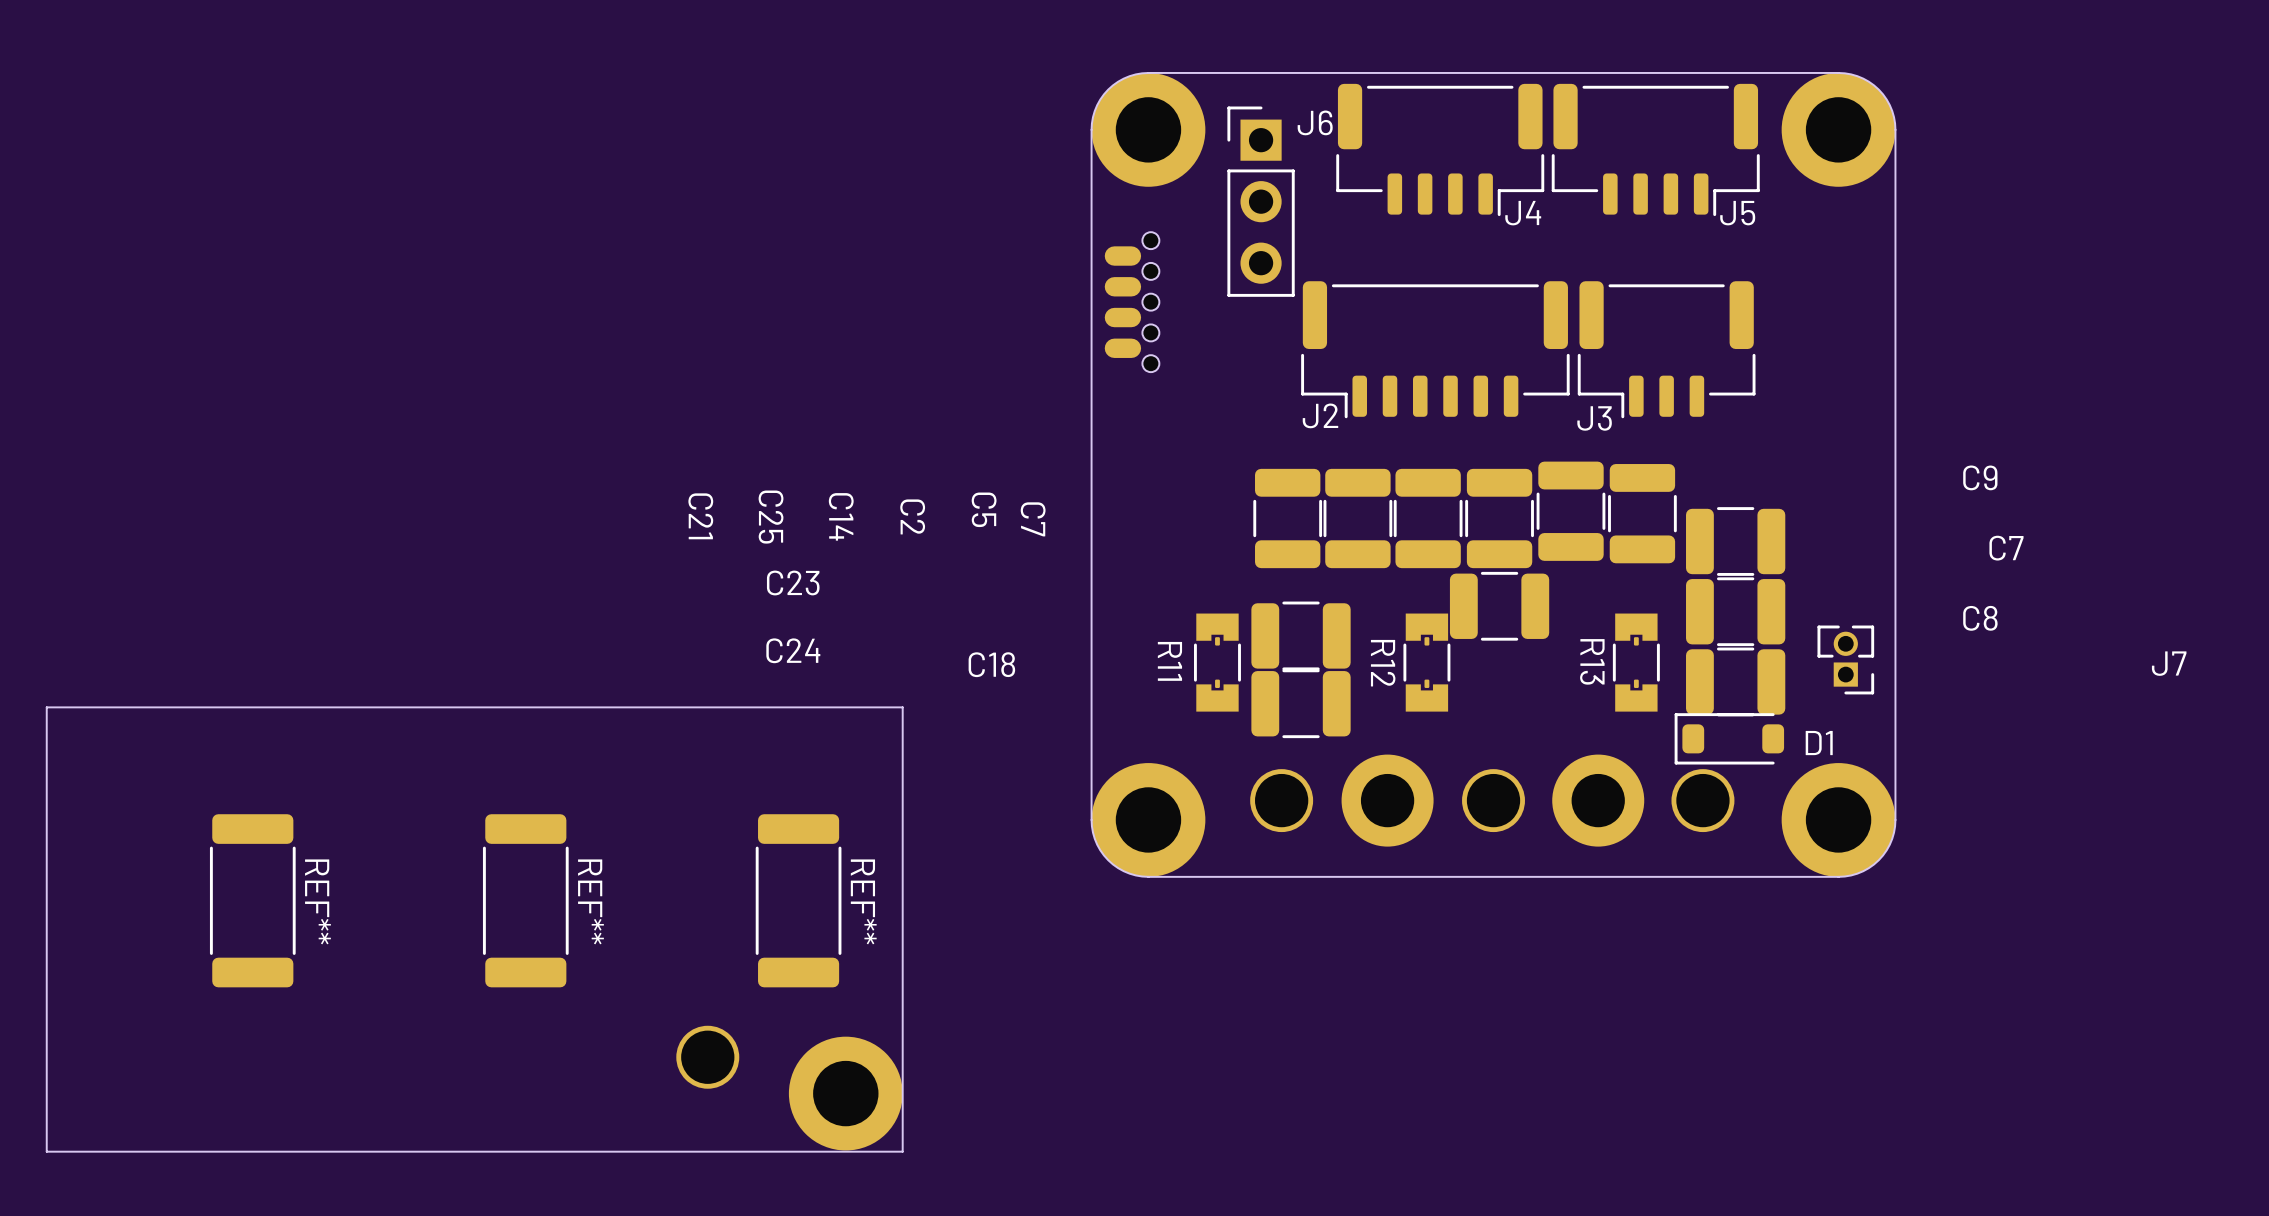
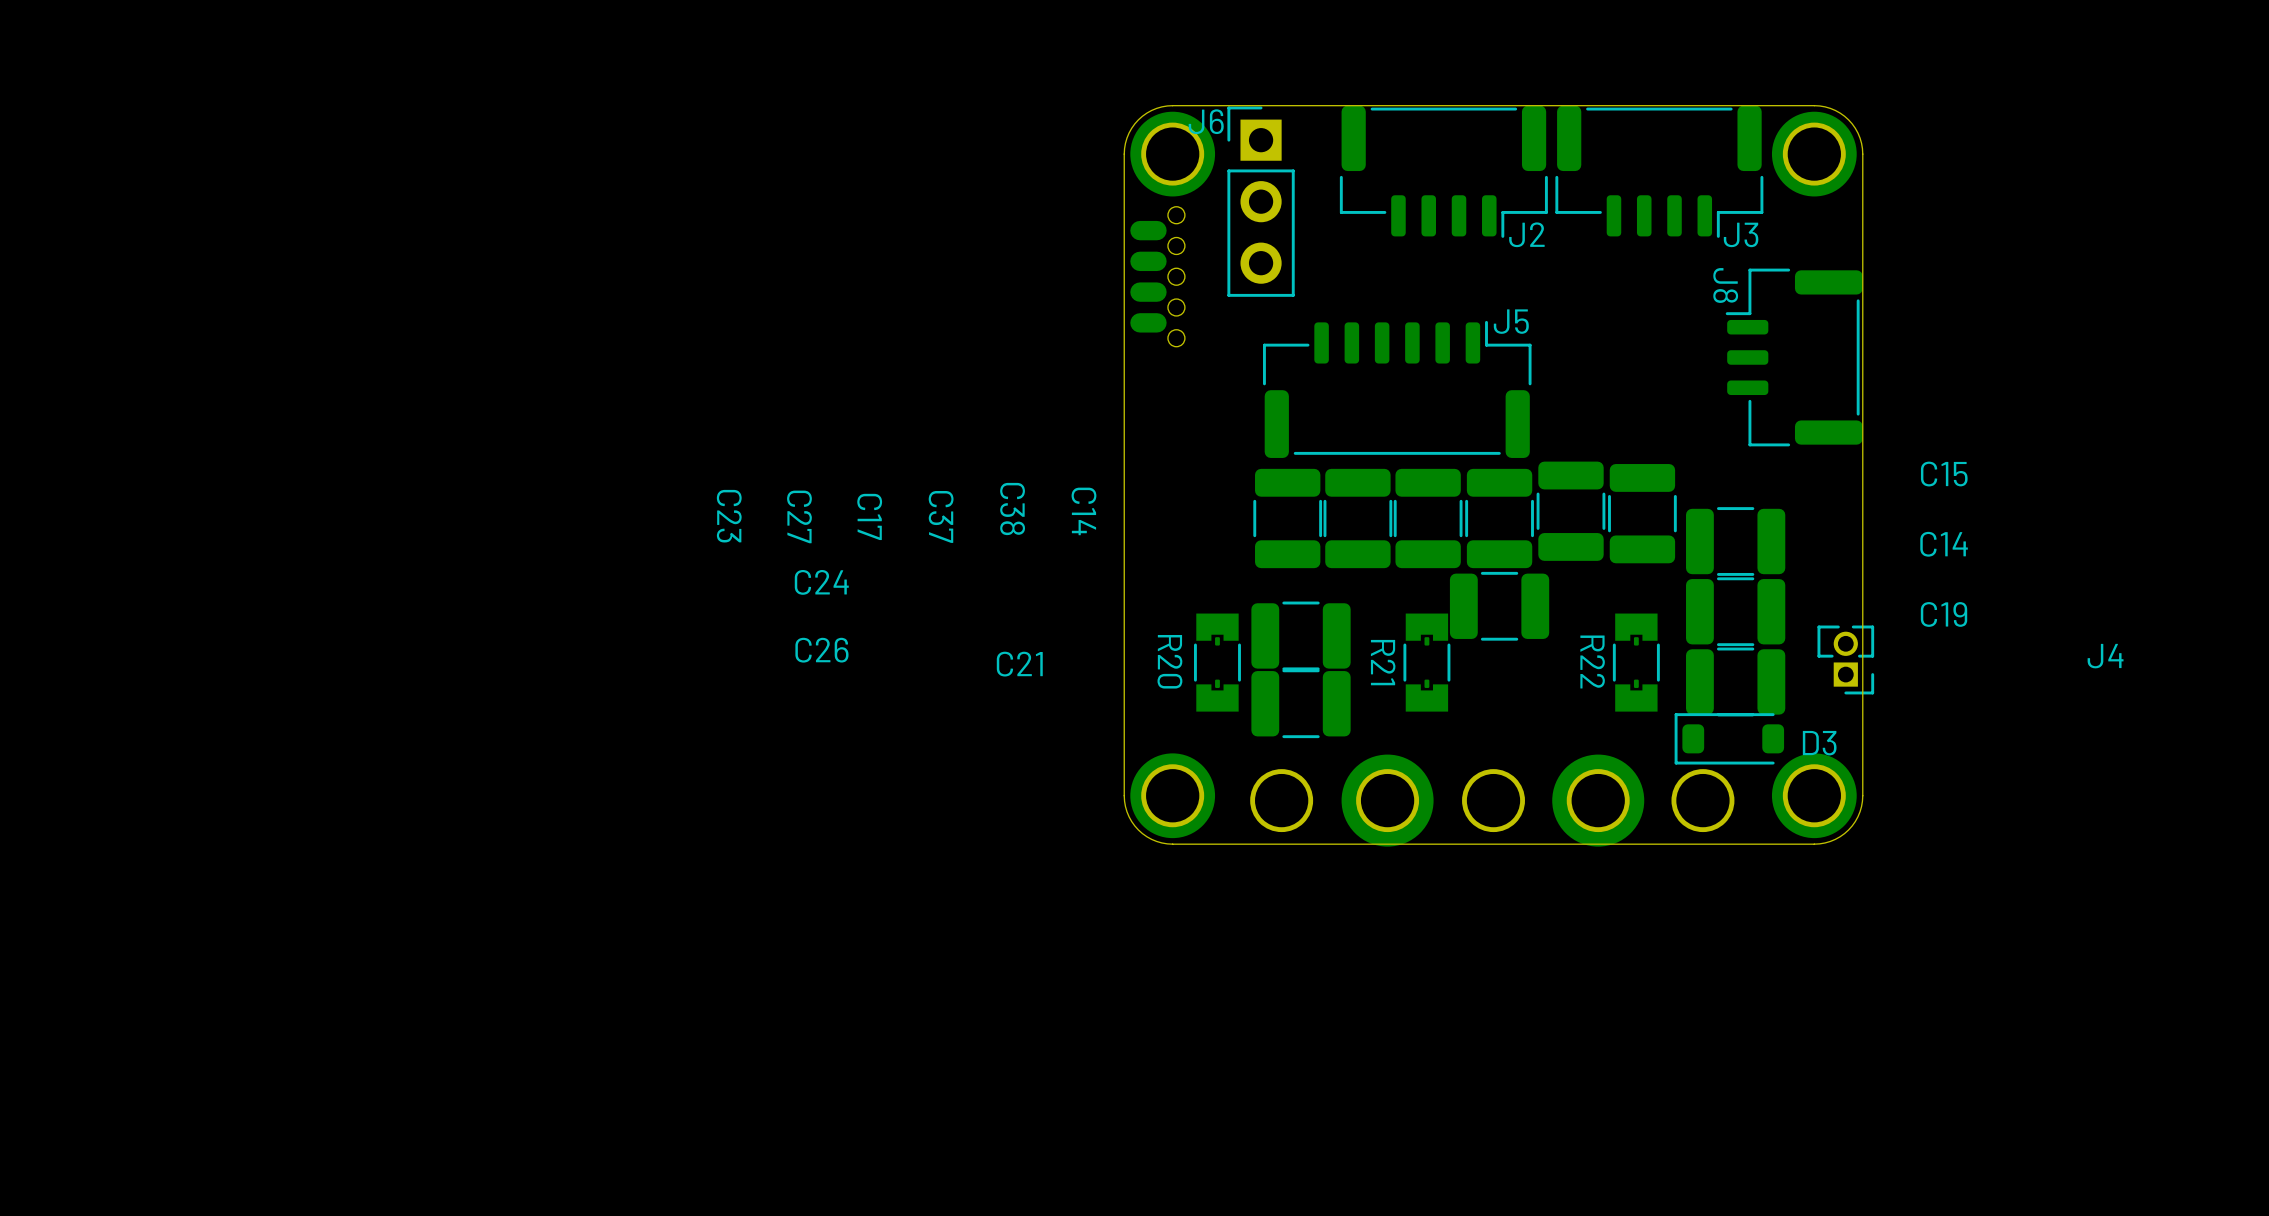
board edge: (1838, 72) (1148, 72) (1123, 78) (1108, 89) (1094, 111) (1091, 129) (1091, 819) (1097, 844) (1108, 860) (1129, 873) (1148, 876) (1838, 876) (1863, 871) (1878, 860) (1892, 838) (1895, 819) (1895, 129) (1892, 111) (1878, 89) (1863, 78) (1838, 72) -> (1814, 105) (1830, 108) (1848, 119) (1860, 138) (1862, 154) (1862, 795) (1860, 811) (1848, 829) (1830, 841) (1814, 844) (1172, 844) (1151, 839) (1138, 829) (1129, 816) (1124, 795) (1124, 154) (1126, 138) (1138, 119) (1156, 108) (1172, 105) (1814, 105)
J5 footprint: [1551, 83, 1760, 217] -> [1262, 320, 1532, 458]
J6 name position: J6 (1315, 122) -> J6 (1206, 121)
part: (1148, 129) -> none
part: (1838, 129) -> none
J4: (1440, 149) -> none
part: none -> (1172, 154)
part: none -> (1814, 154)
J5 name position: J5 (1737, 213) -> J5 (1511, 321)
J2 footprint: [1301, 281, 1570, 419] -> [1339, 105, 1548, 238]
J3 footprint: [1577, 281, 1756, 419] -> [1555, 105, 1764, 238]
part position: (1132, 302) -> (1157, 276)
J8: none -> (1794, 357)
J2 name position: J2 (1320, 415) -> J2 (1526, 234)
J3 name position: J3 (1594, 418) -> J3 (1741, 234)
C9 name: C9 (1980, 477) -> C15 (1944, 474)
C5 name: C5 (984, 509) -> C38 (1012, 509)
C21 name: C21 (700, 516) -> C23 (729, 516)
C14 name: C14 (841, 516) -> C17 (869, 516)
C2 name: C2 (912, 516) -> C37 (941, 516)
C25 name: C25 (771, 517) -> C27 (799, 516)
C7 name: C7 (1033, 519) -> C14 (1083, 511)
C7 name: C7 (2006, 548) -> C14 (1944, 544)
C23 name: C23 (793, 582) -> C24 (821, 582)
C8 name: C8 (1980, 618) -> C19 (1944, 614)
C24 name: C24 (793, 650) -> C26 (821, 650)
R11 name: R11 (1169, 661) -> R20 (1169, 661)
R13 name: R13 (1592, 661) -> R22 (1592, 661)
R12 name: R12 (1383, 663) -> R21 (1383, 662)
J7 name: J7 (2169, 663) -> J4 (2105, 656)
C18 name: C18 (991, 664) -> C21 (1019, 664)
board edge: (902, 707) (46, 707) (46, 1151) (902, 1151) (902, 707) -> none
D1 name: D1 (1819, 743) -> D3 (1819, 743)
part: none -> (1172, 795)
part: none -> (1814, 795)
part: (1148, 819) -> none
part: (1838, 819) -> none
REF**: (252, 900) -> none
REF**: (525, 900) -> none
REF**: (798, 900) -> none
part: (707, 1057) -> none
part: (845, 1093) -> none

